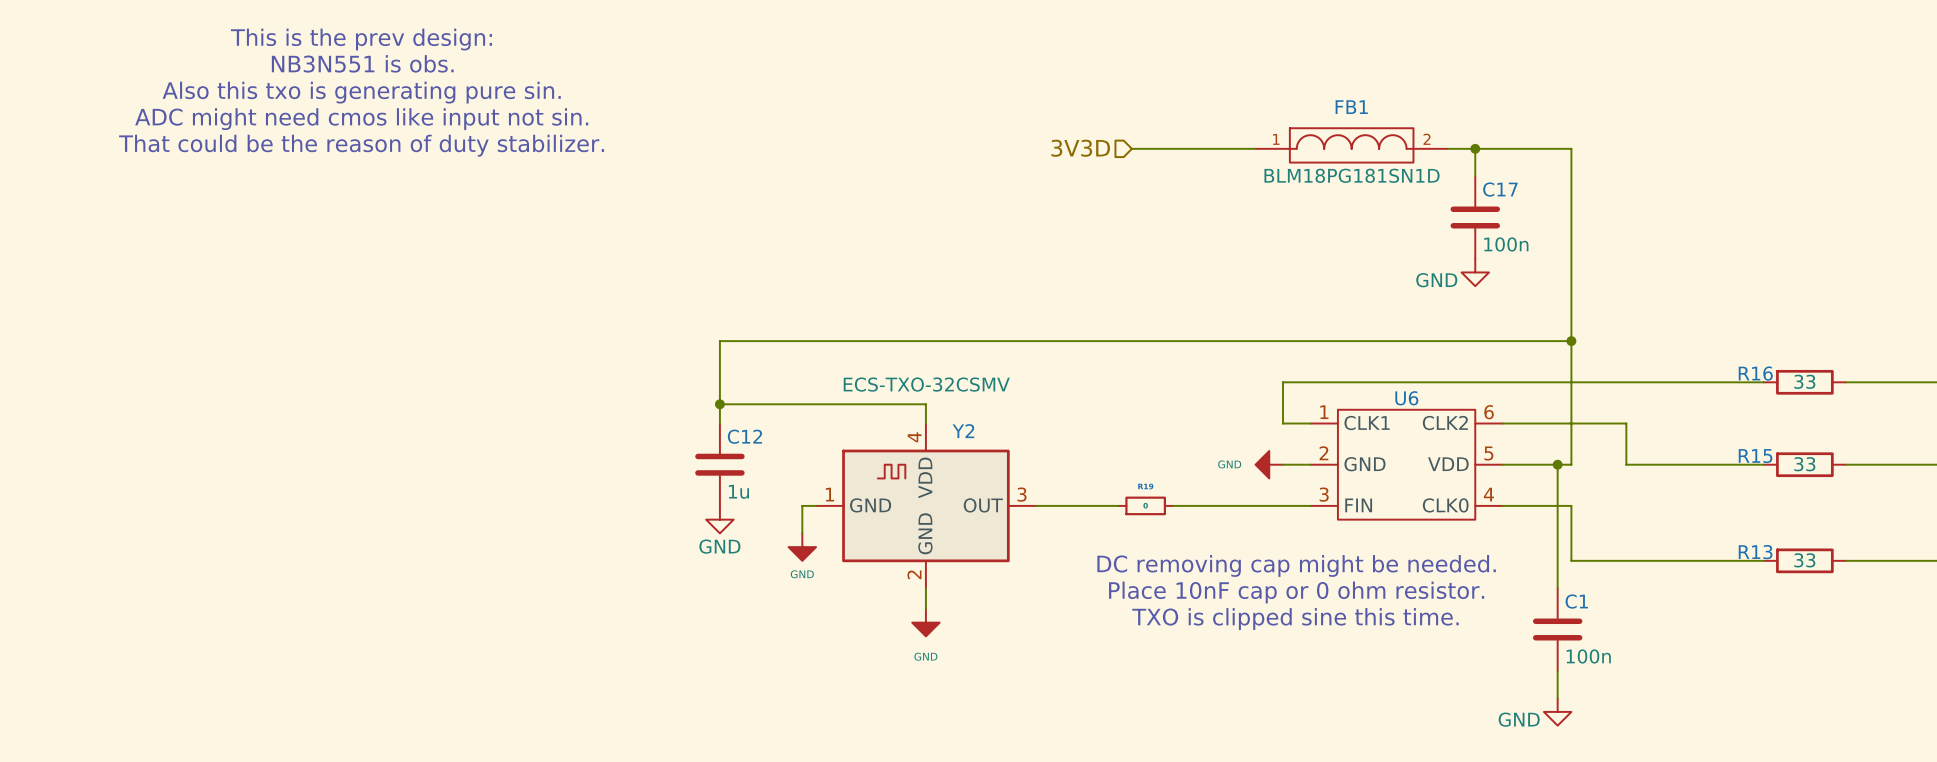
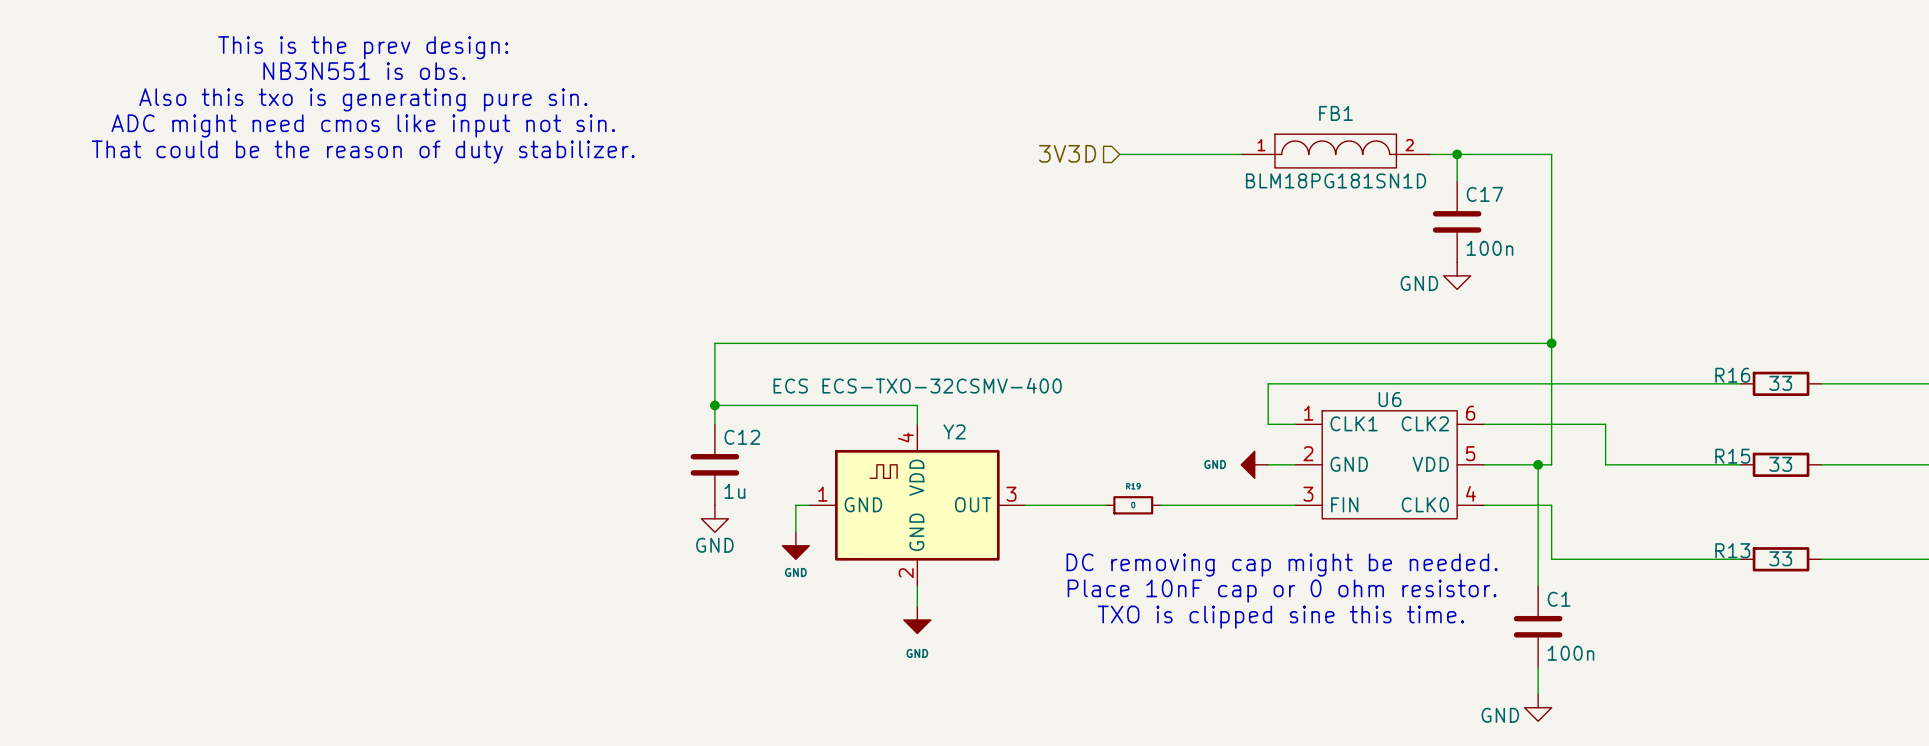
Y2 value: ECS-TXO-32CSMV (926, 384) -> ECS ECS-TXO-32CSMV-400 (917, 385)

